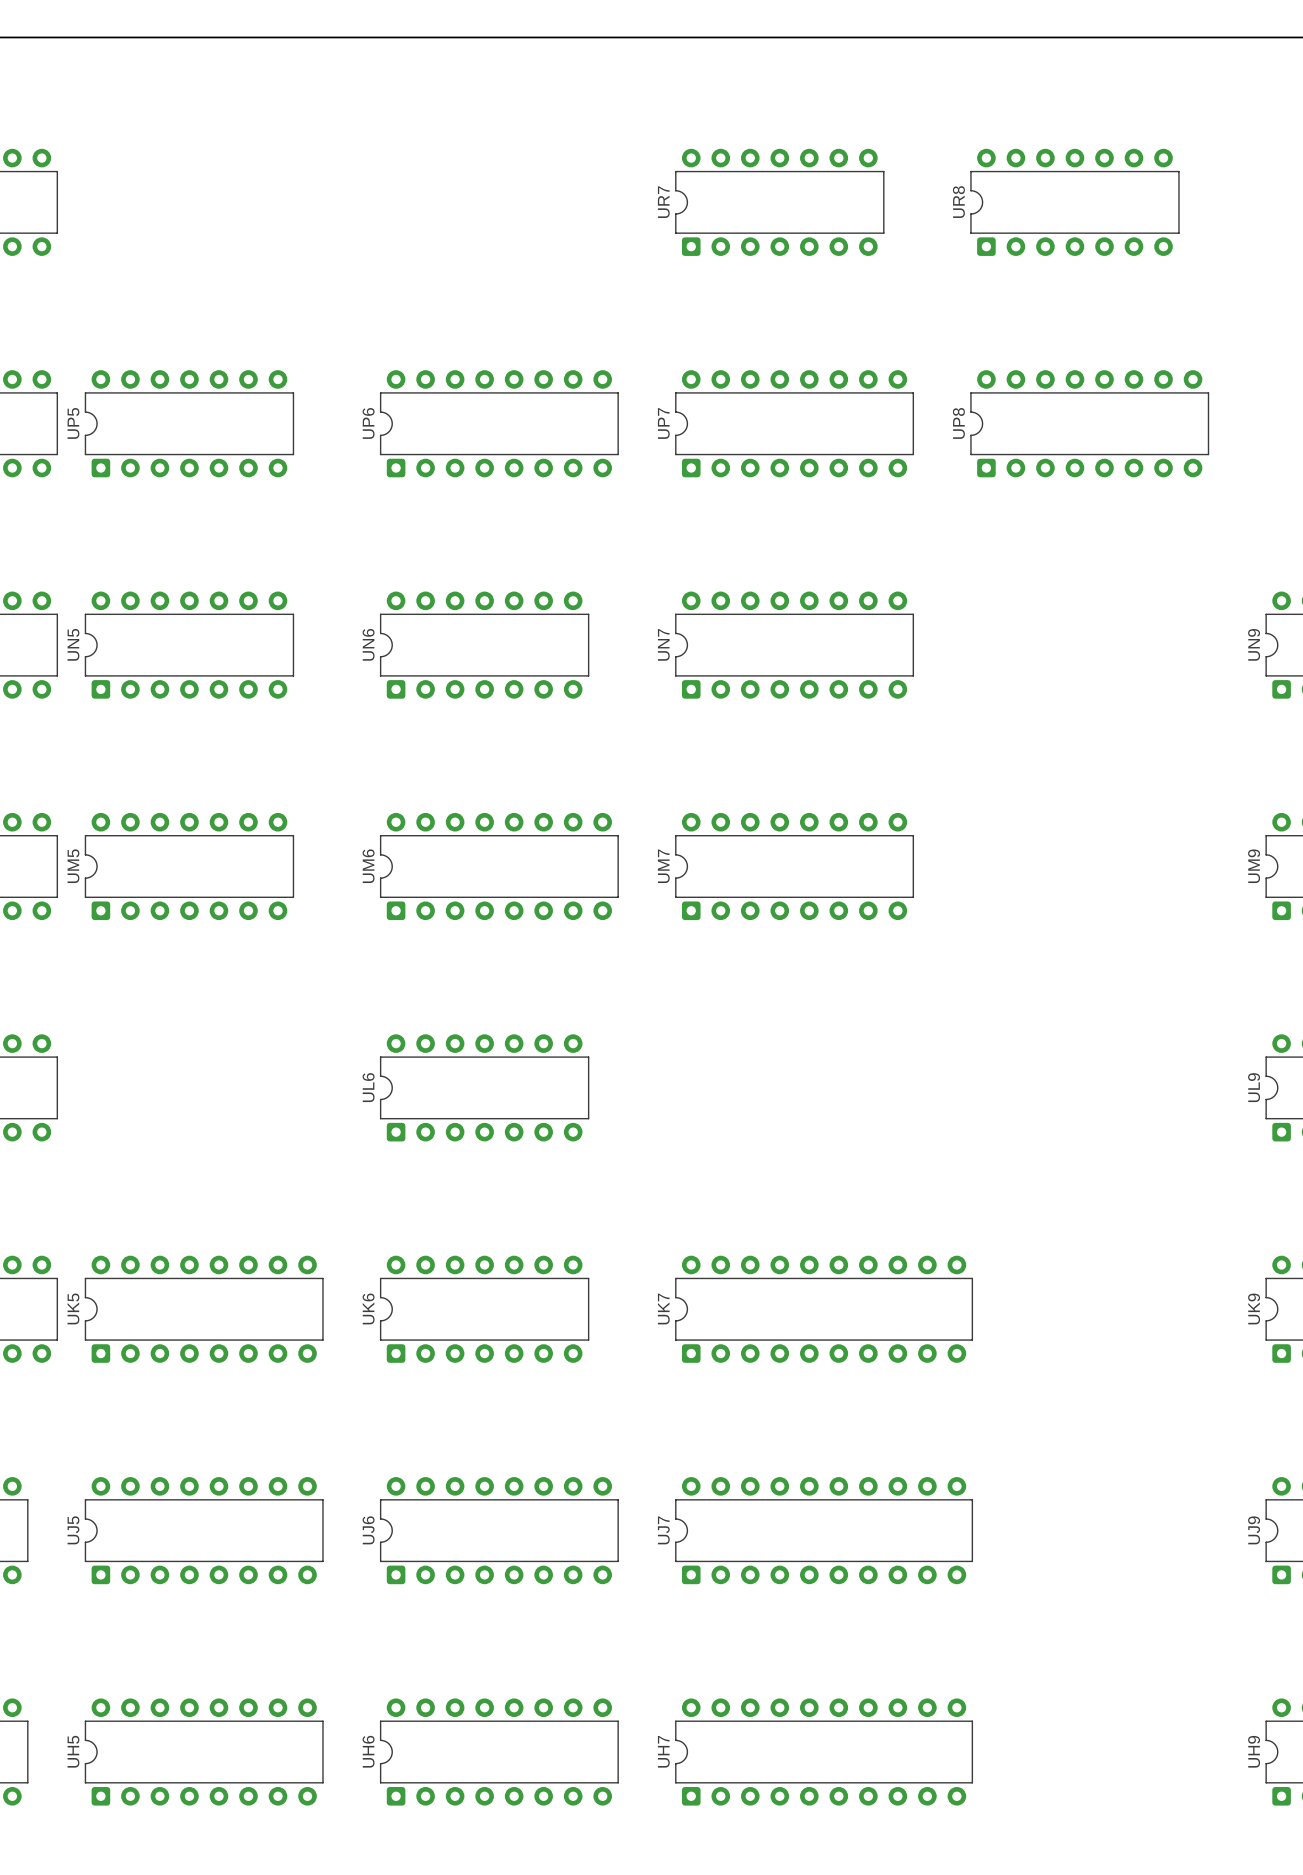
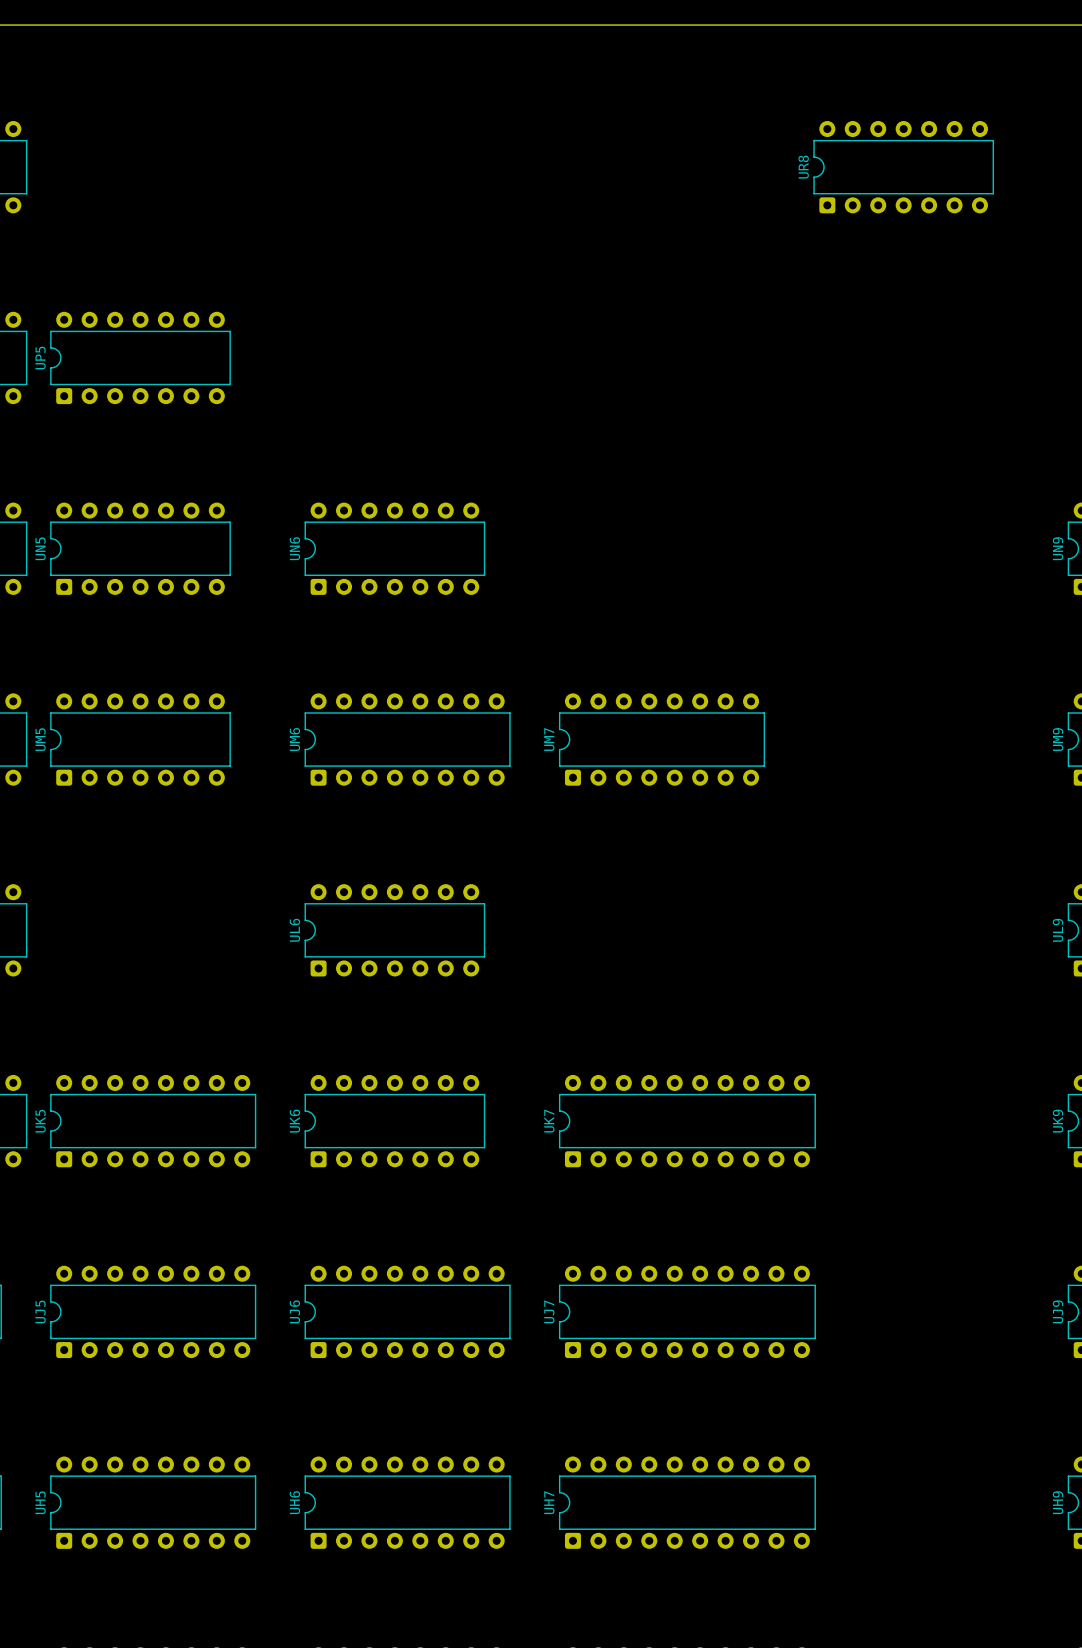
UR7: (779, 202) -> none
UP6: (499, 423) -> none
UP7: (794, 423) -> none
UP8: (1089, 423) -> none
UN7: (794, 645) -> none

